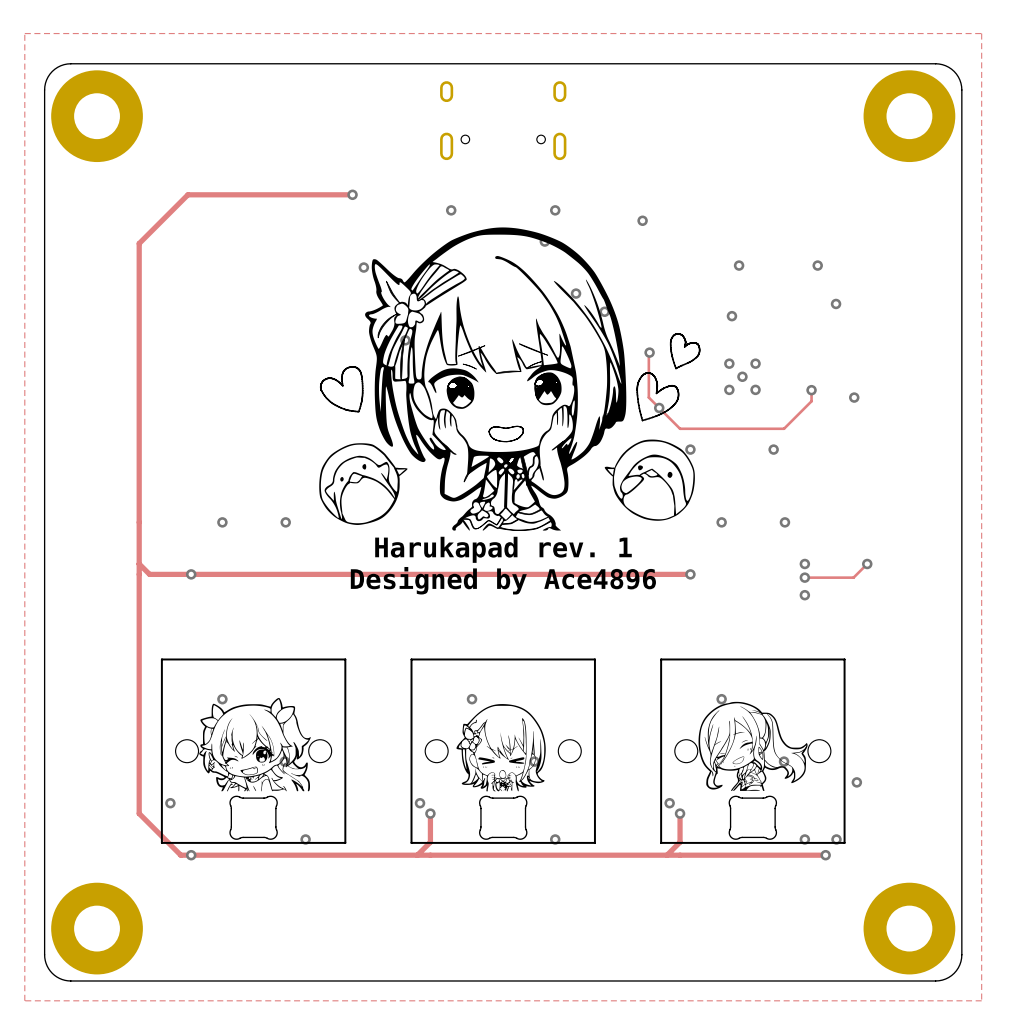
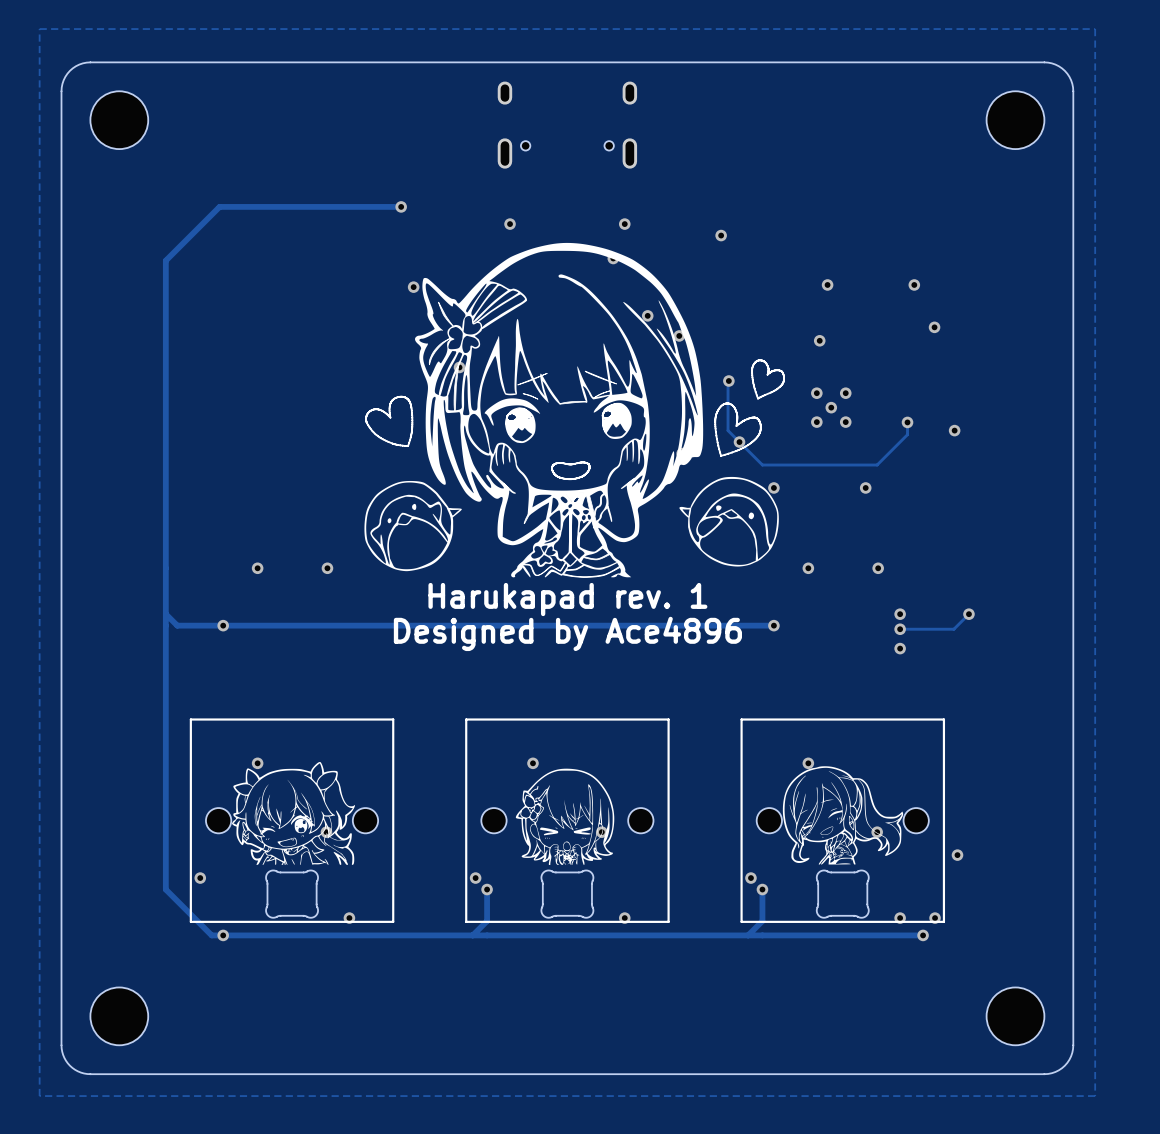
part footprint: [51, 70, 143, 163] -> [90, 91, 149, 150]
part footprint: [863, 70, 956, 163] -> [986, 91, 1045, 150]
part footprint: [51, 882, 143, 975] -> [90, 987, 149, 1046]
part footprint: [863, 882, 956, 975] -> [986, 987, 1045, 1046]

